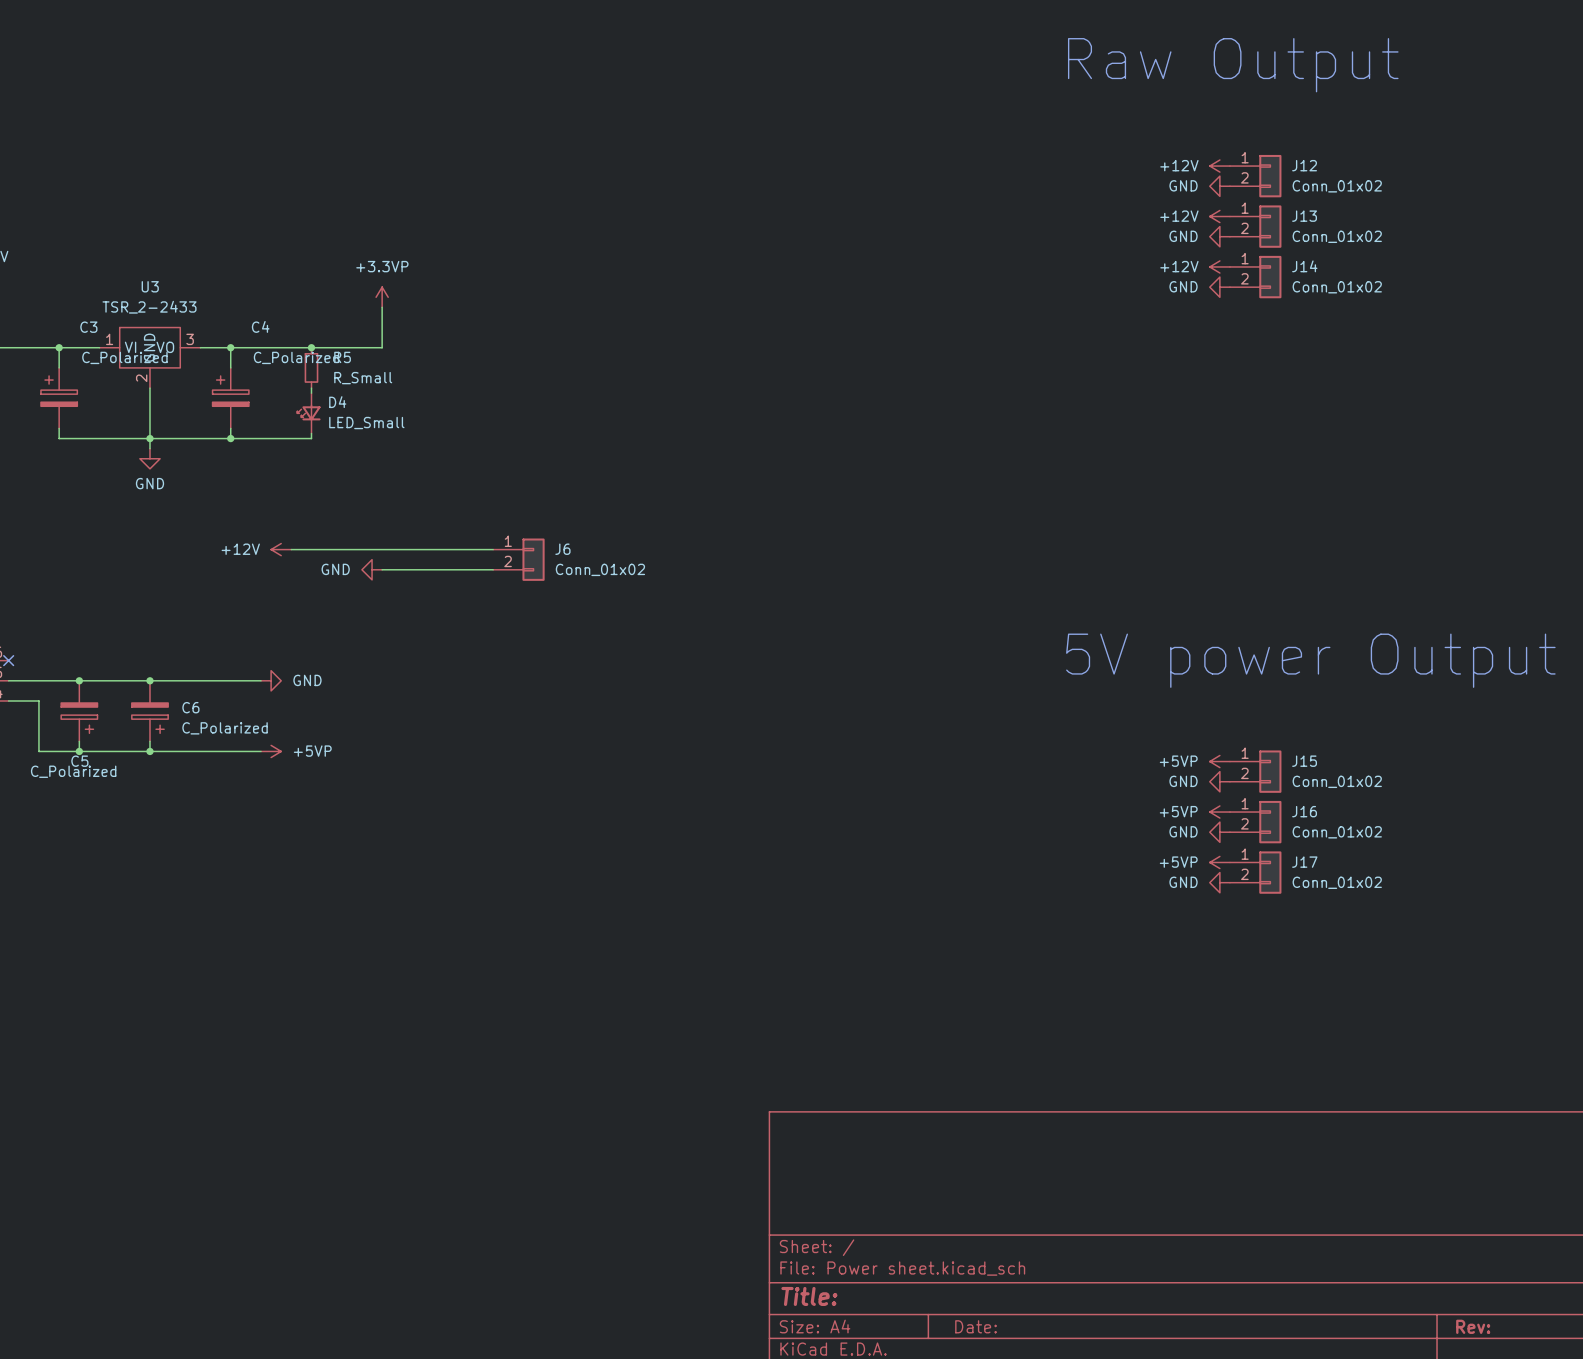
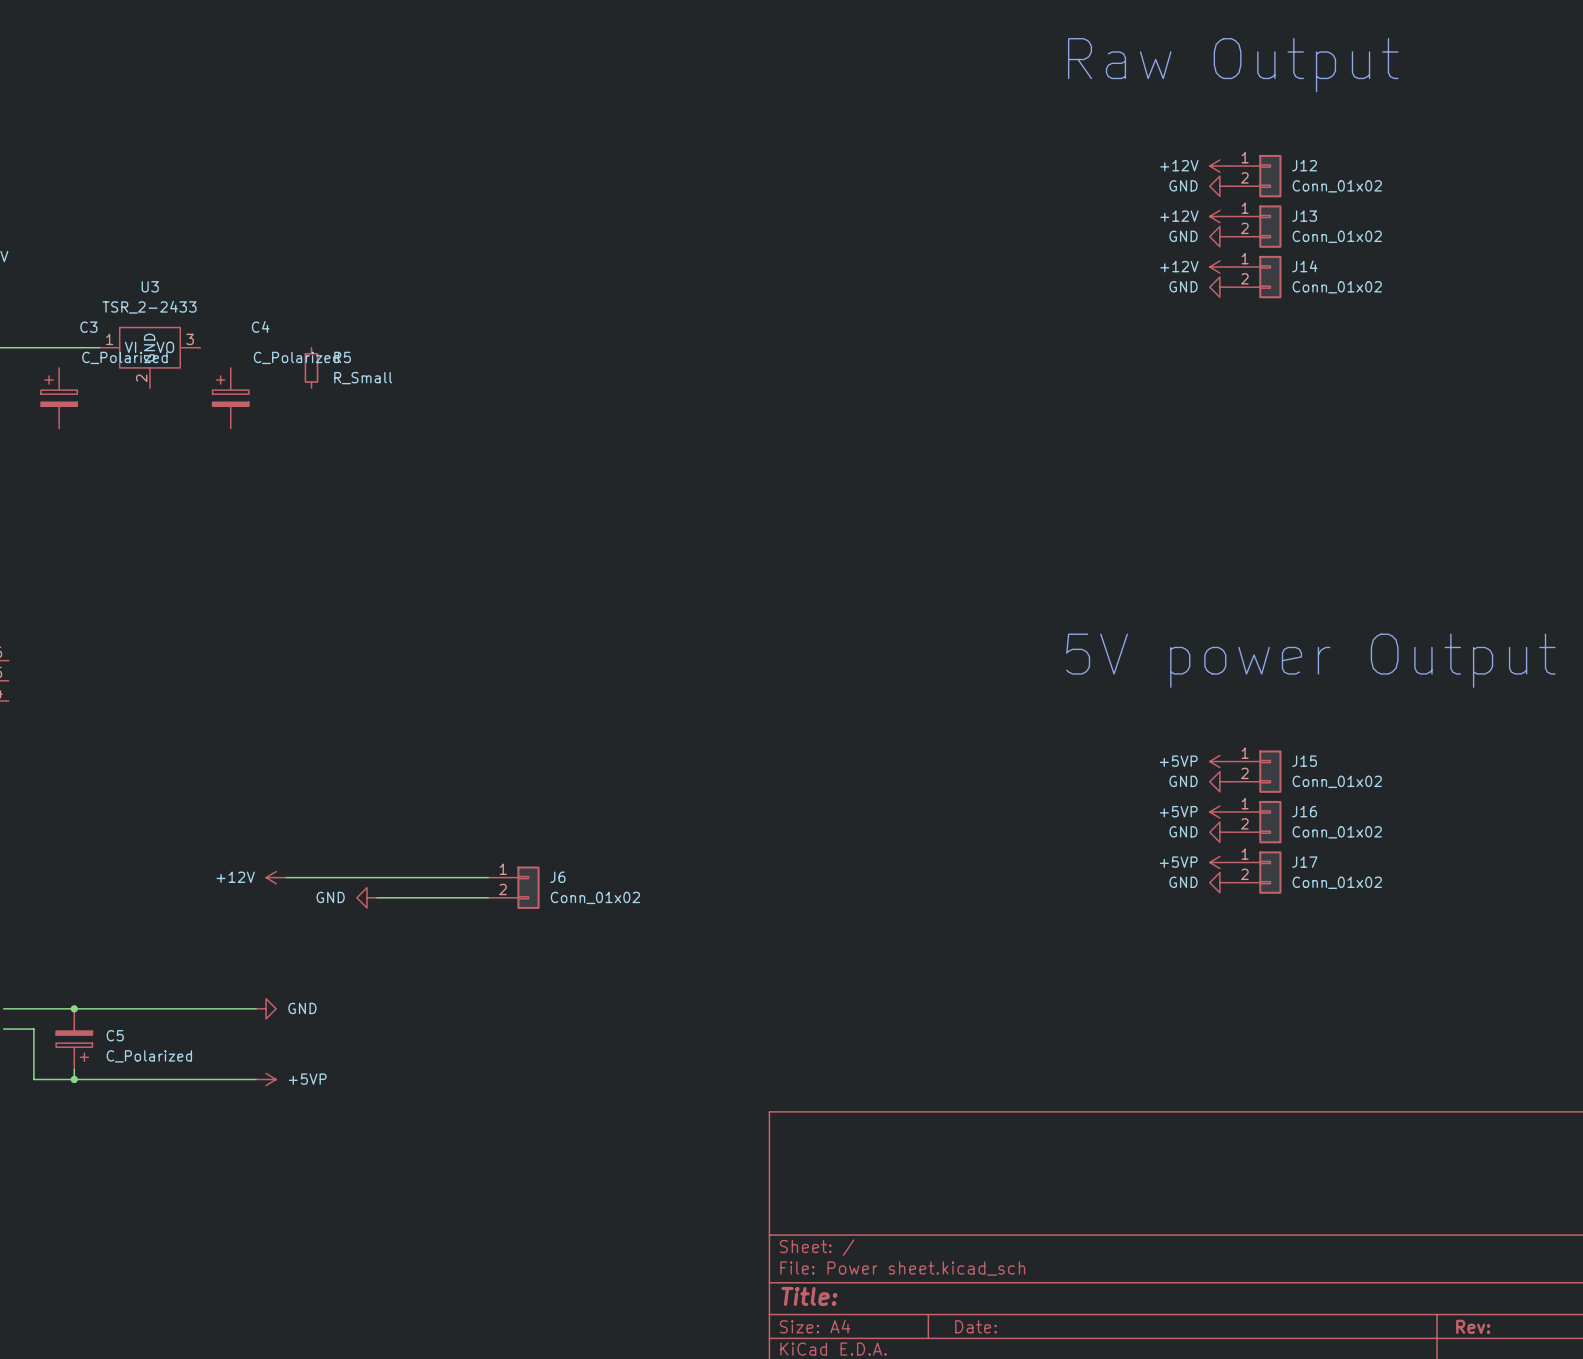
power symbol: +3.3VP (382, 297) -> none
wire: (382, 307) (382, 347) (200, 347) -> none
wire: (59, 347) (59, 367) -> none
junction: (59, 347) -> none
wire: (230, 347) (230, 367) -> none
junction: (230, 347) -> none
junction: (311, 347) -> none
wire: (149, 388) (149, 448) -> none
wire: (311, 388) (311, 393) -> none
D4: LED_Small (308, 413) -> none
wire: (59, 428) (59, 438) (311, 438) (311, 433) -> none
wire: (230, 428) (230, 438) -> none
junction: (149, 438) -> none
junction: (230, 438) -> none
power symbol: GND (149, 458) -> none
power symbol: +12V (281, 549) -> none
wire: (291, 549) (493, 549) -> none
J6 position: (518, 559) -> (513, 887)
power symbol: GND (372, 569) -> none
wire: (382, 569) (493, 569) -> none
no-connect mark: (8, 660) -> none
wire: (8, 680) (261, 680) -> none
junction: (79, 680) -> none
junction: (149, 680) -> none
power symbol: GND (271, 680) -> none
wire: (8, 700) (38, 700) (38, 751) (261, 751) -> none
C5 position: (79, 711) -> (74, 1039)
C6: C_Polarized (149, 711) -> none
wire: (79, 741) (79, 751) -> none
wire: (149, 741) (149, 751) -> none
junction: (79, 751) -> none
junction: (149, 751) -> none
power symbol: +5VP (271, 751) -> none
C5 name position: C5 (79, 761) -> C5 (115, 1035)
C5 value position: C_Polarized (73, 771) -> C_Polarized (149, 1056)
power symbol: none -> +12V (276, 877)
wire: none -> (286, 877) (488, 877)
power symbol: none -> GND (367, 897)
wire: none -> (377, 897) (488, 897)
wire: none -> (3, 1008) (255, 1008)
junction: none -> (74, 1008)
power symbol: none -> GND (266, 1008)
wire: none -> (3, 1029) (33, 1029) (33, 1079) (255, 1079)
wire: none -> (74, 1069) (74, 1079)
junction: none -> (74, 1079)
power symbol: none -> +5VP (266, 1079)

